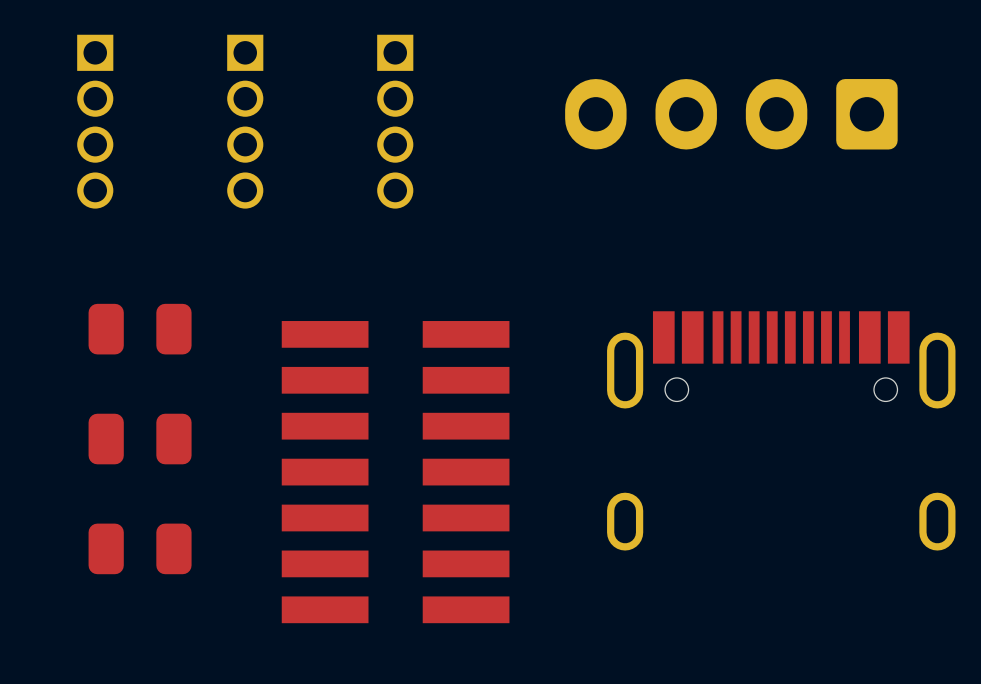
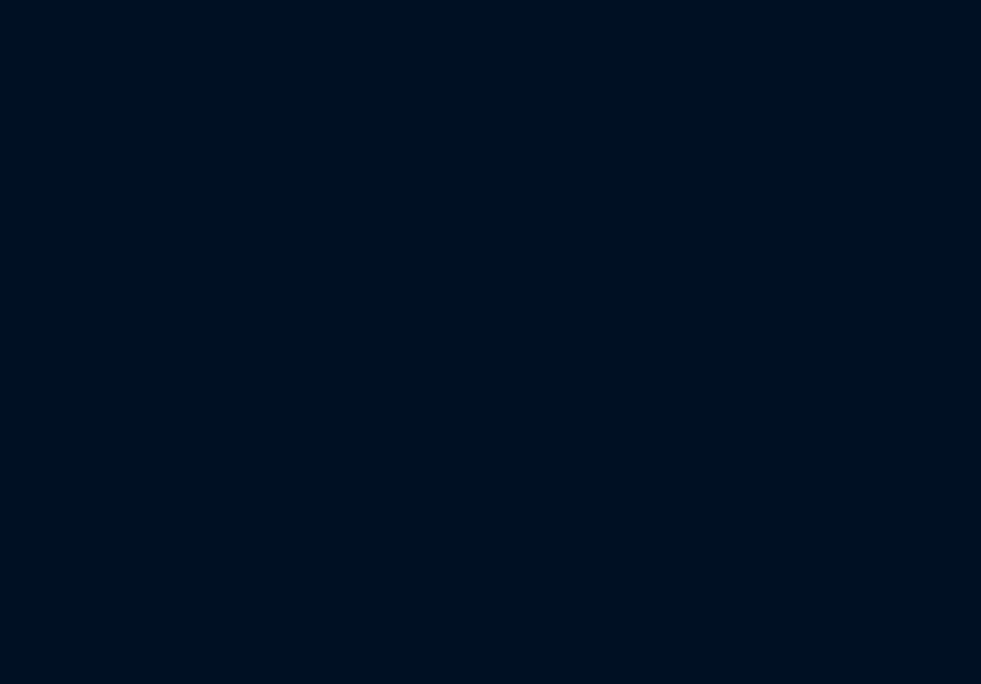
part: (731, 114) -> none
part: (95, 121) -> none
part: (245, 121) -> none
part: (395, 121) -> none
part: (140, 329) -> none
part: (781, 430) -> none
part: (140, 439) -> none
part: (395, 472) -> none
part: (140, 548) -> none

